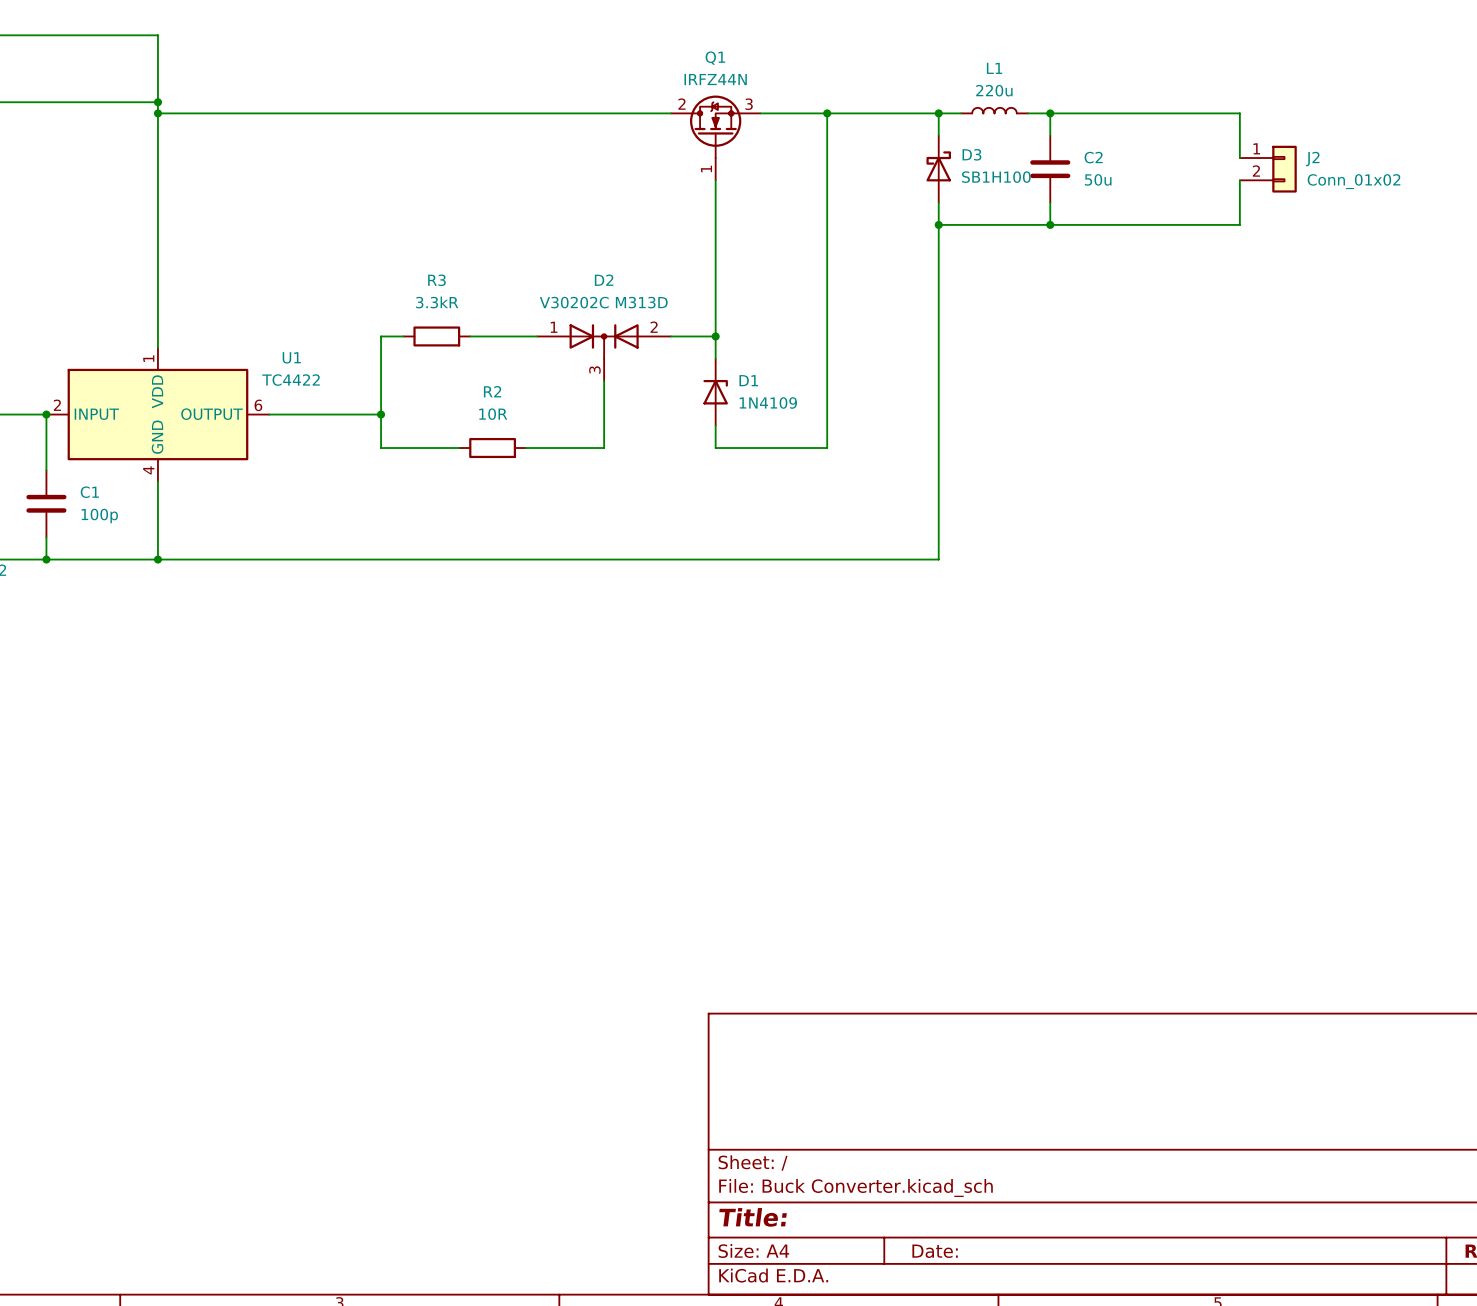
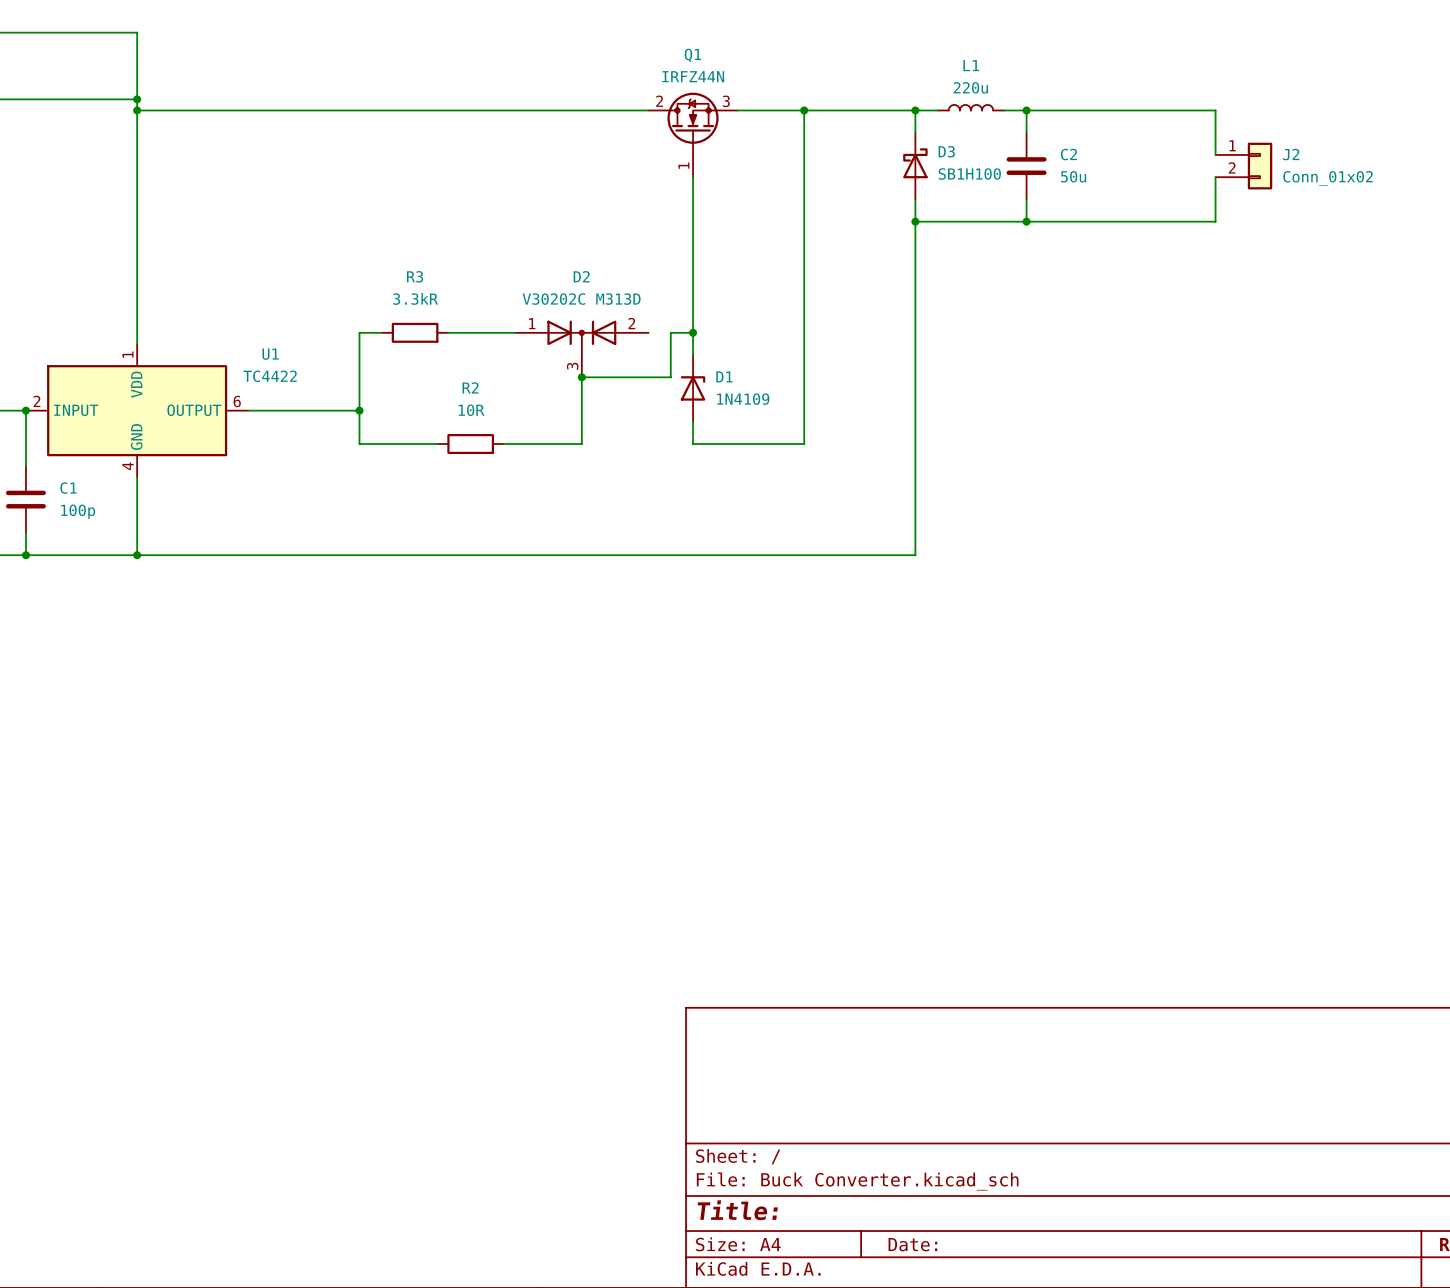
wire: (671, 336) (693, 336) -> (581, 377) (670, 377) (670, 332)
junction: none -> (581, 377)

